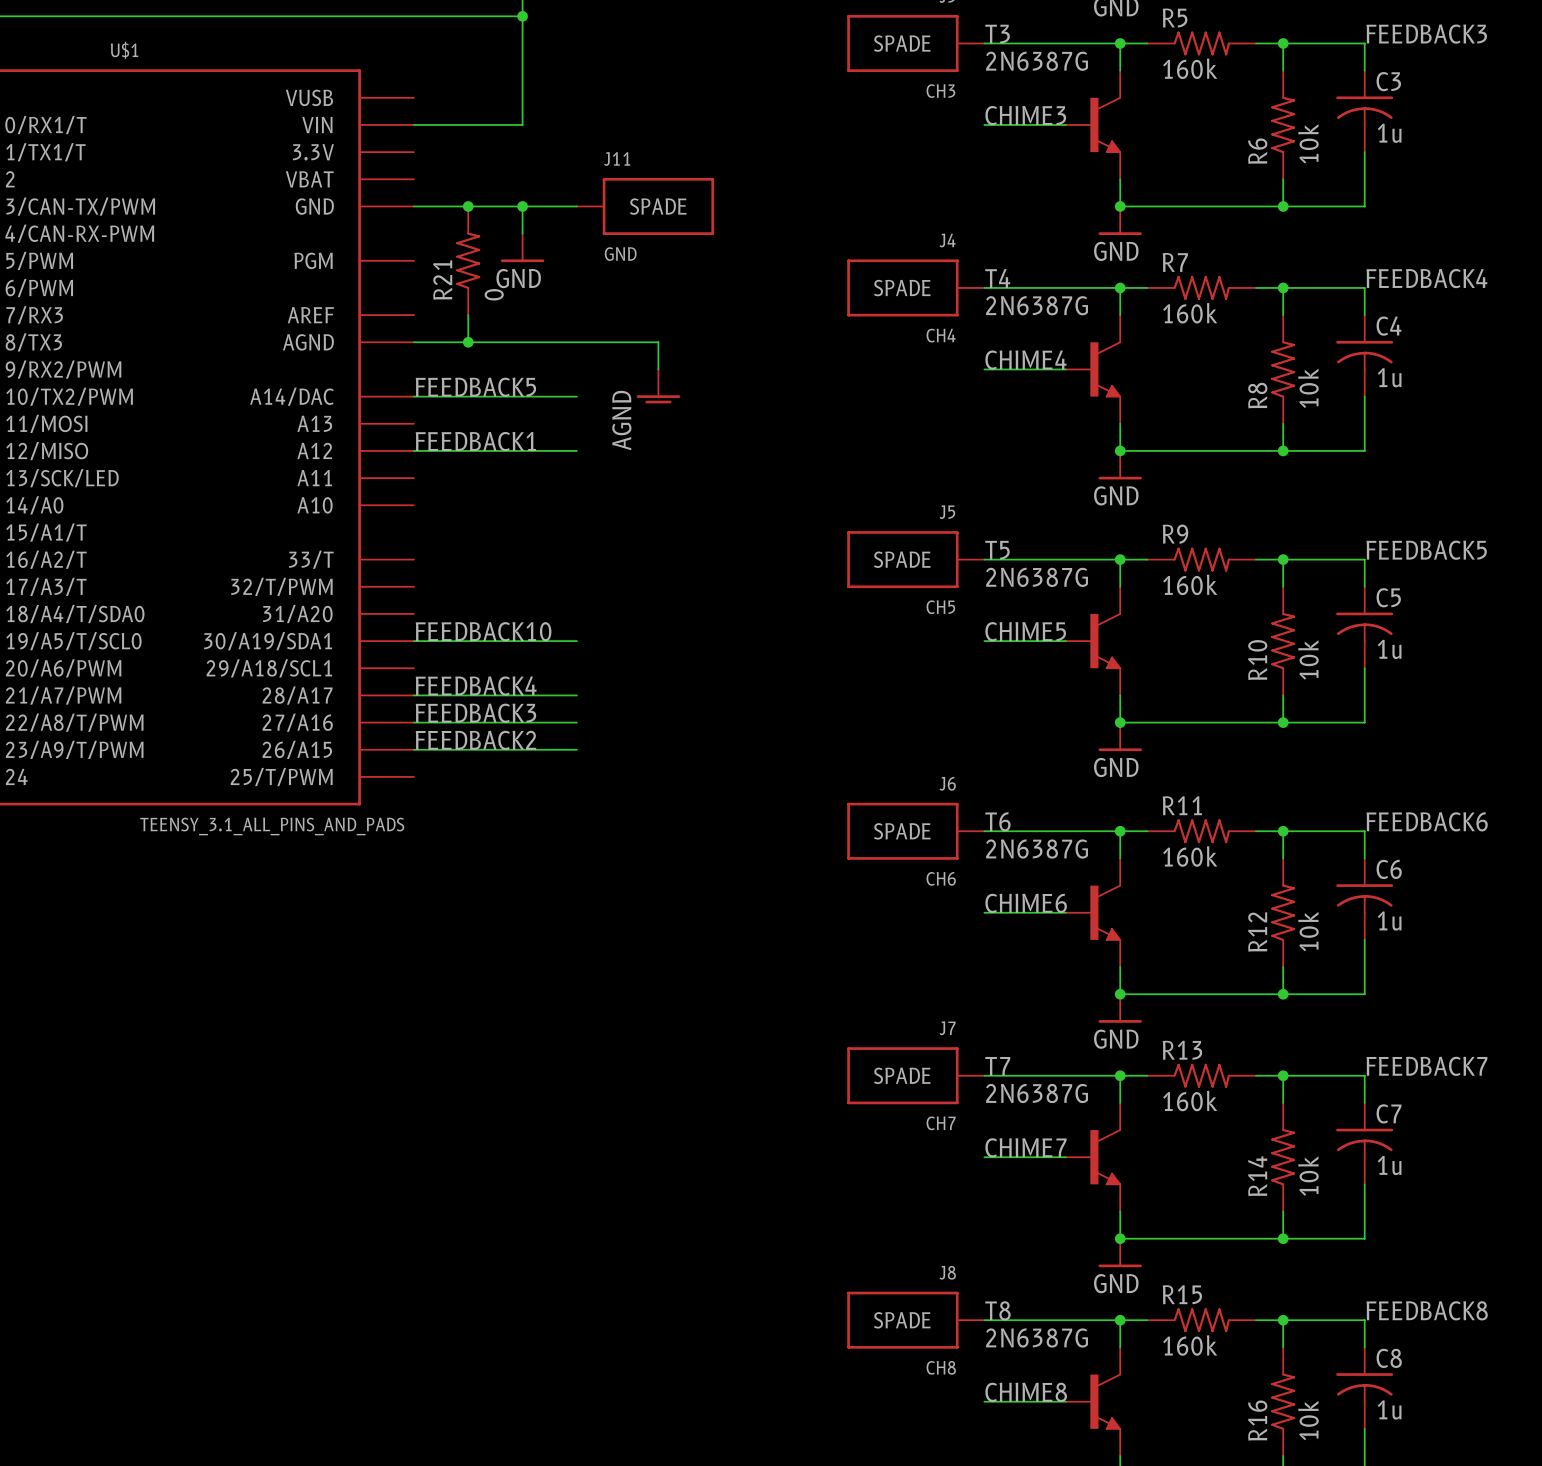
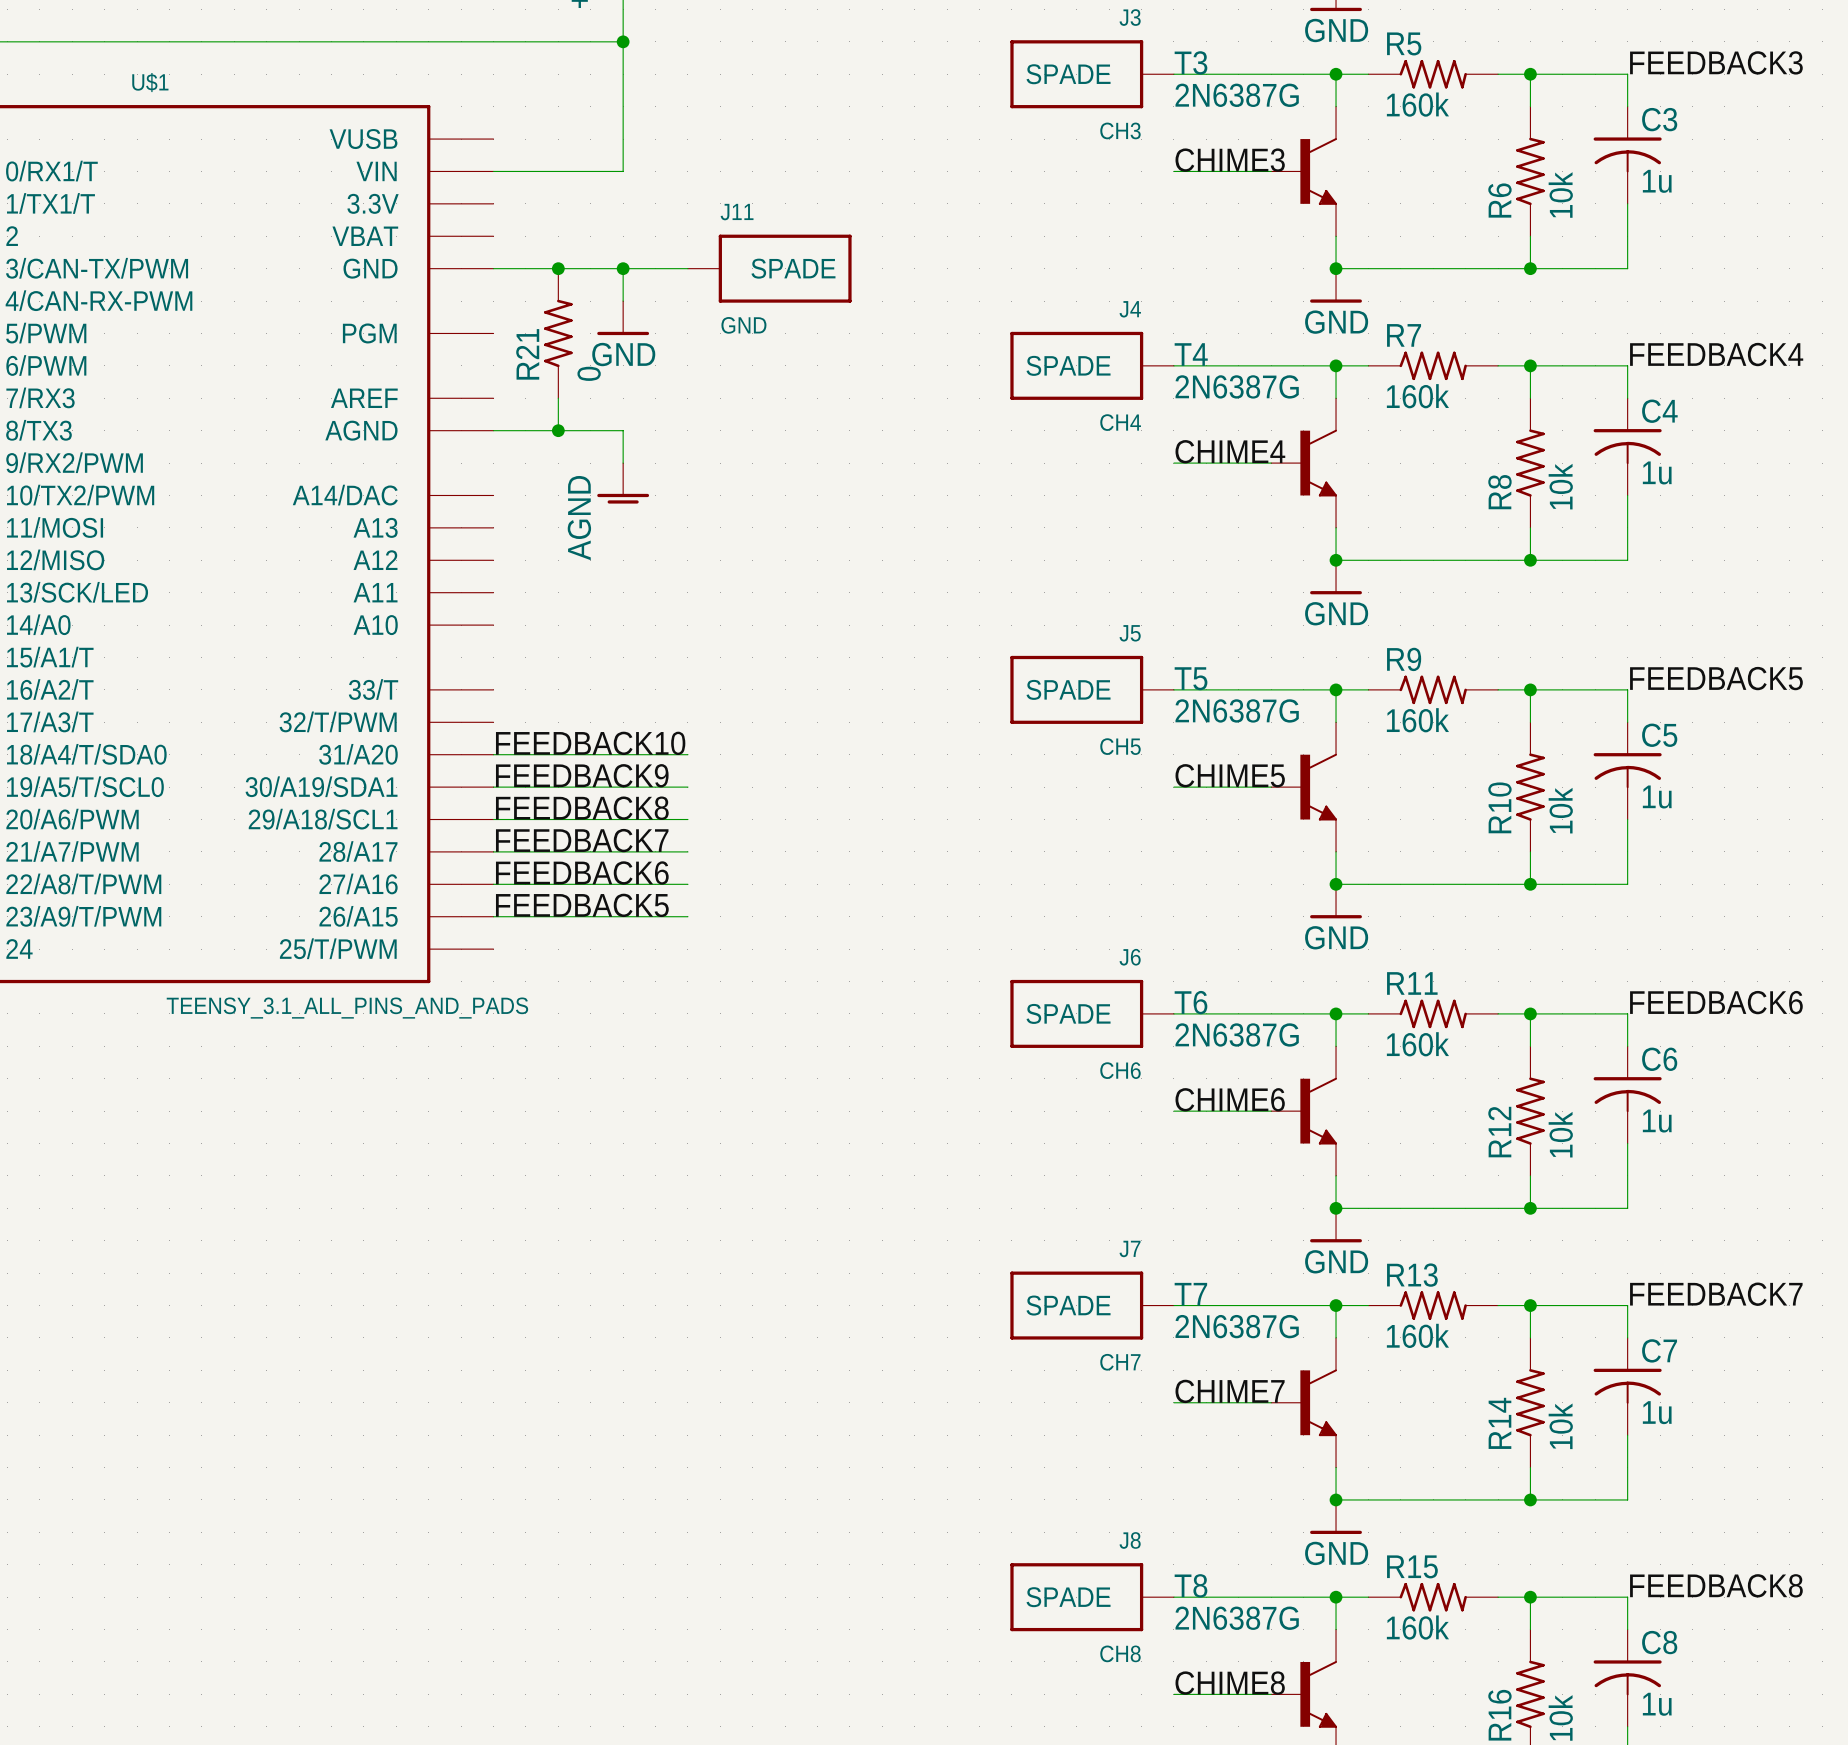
wire: (522, 342) (658, 342) (658, 369) -> (623, 430) (623, 463)
power symbol position: AGND (658, 386) -> AGND (623, 483)
label: FEEDBACK5 (475, 387) -> none
wire: (413, 396) (576, 396) -> (493, 754) (687, 754)
label: FEEDBACK1 (475, 441) -> none
wire: (413, 450) (576, 450) -> (493, 819) (687, 819)
label: none -> FEEDBACK10 (590, 743)
label: FEEDBACK10 (483, 631) -> FEEDBACK9 (582, 775)
label: none -> FEEDBACK8 (582, 808)
label: FEEDBACK4 (476, 686) -> FEEDBACK7 (582, 840)
label: FEEDBACK3 (475, 713) -> FEEDBACK6 (582, 872)
label: FEEDBACK2 (475, 740) -> FEEDBACK5 (582, 905)

